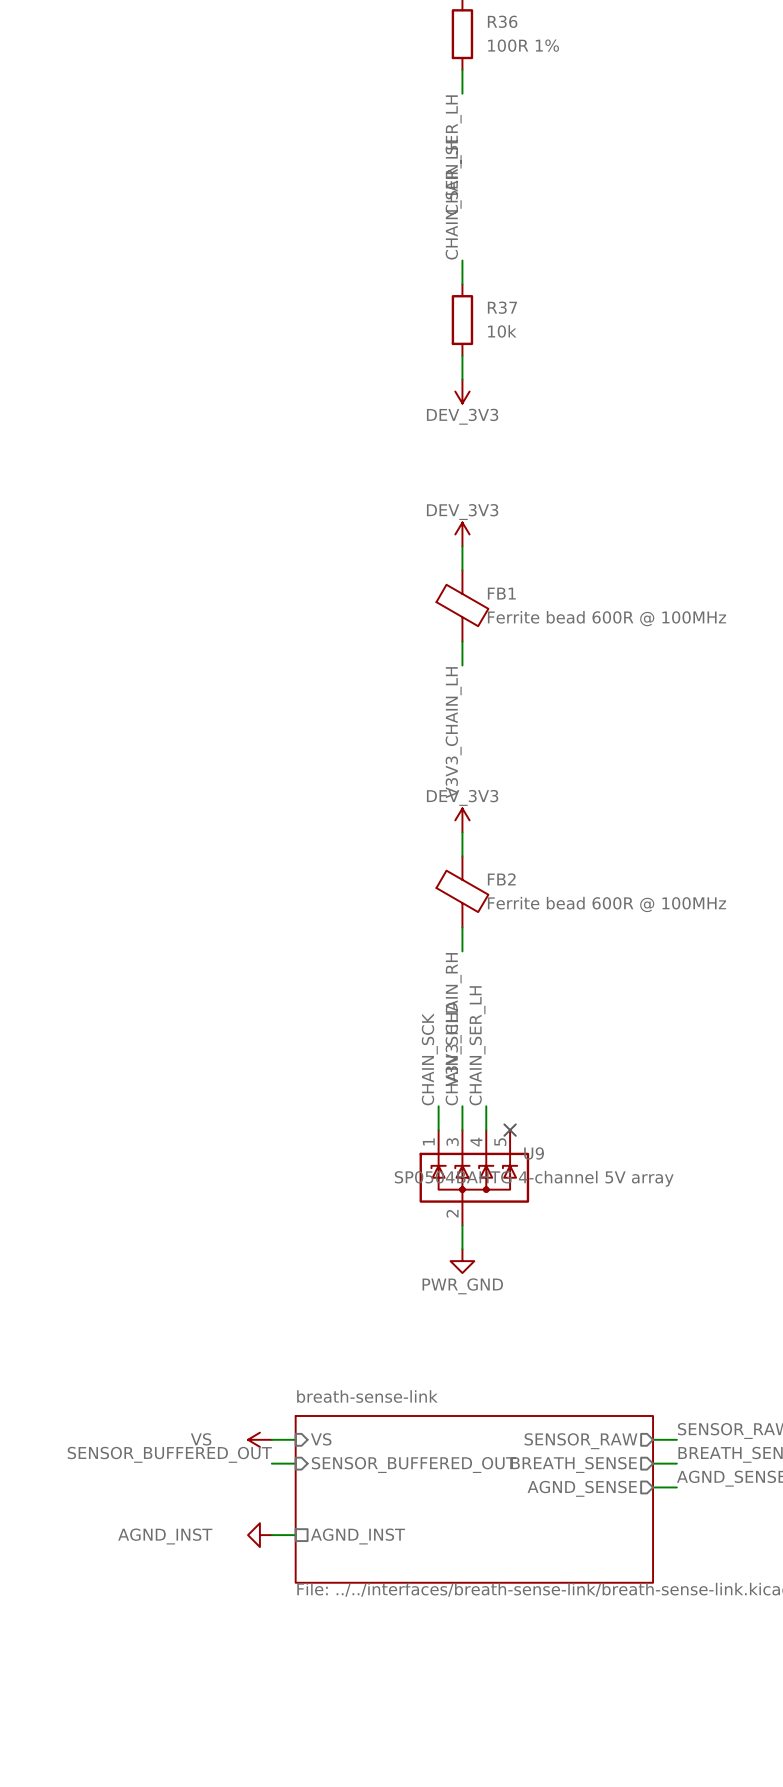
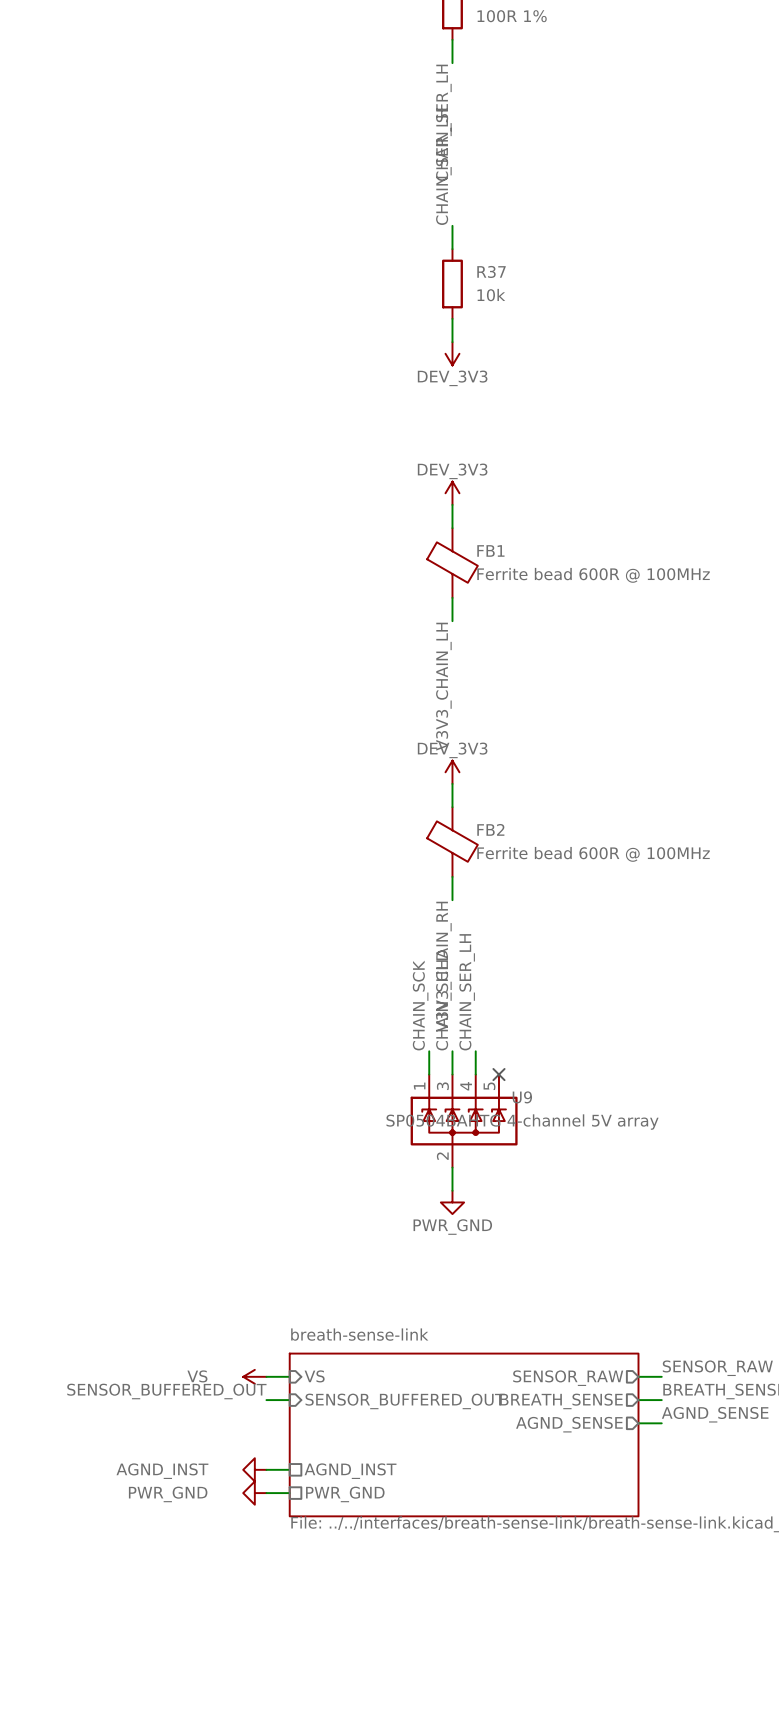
power symbol: none -> PWR_GND (254, 1493)
wire: none -> (266, 1493) (289, 1493)
sheet pin: none -> PWR_GND (345, 1494)

